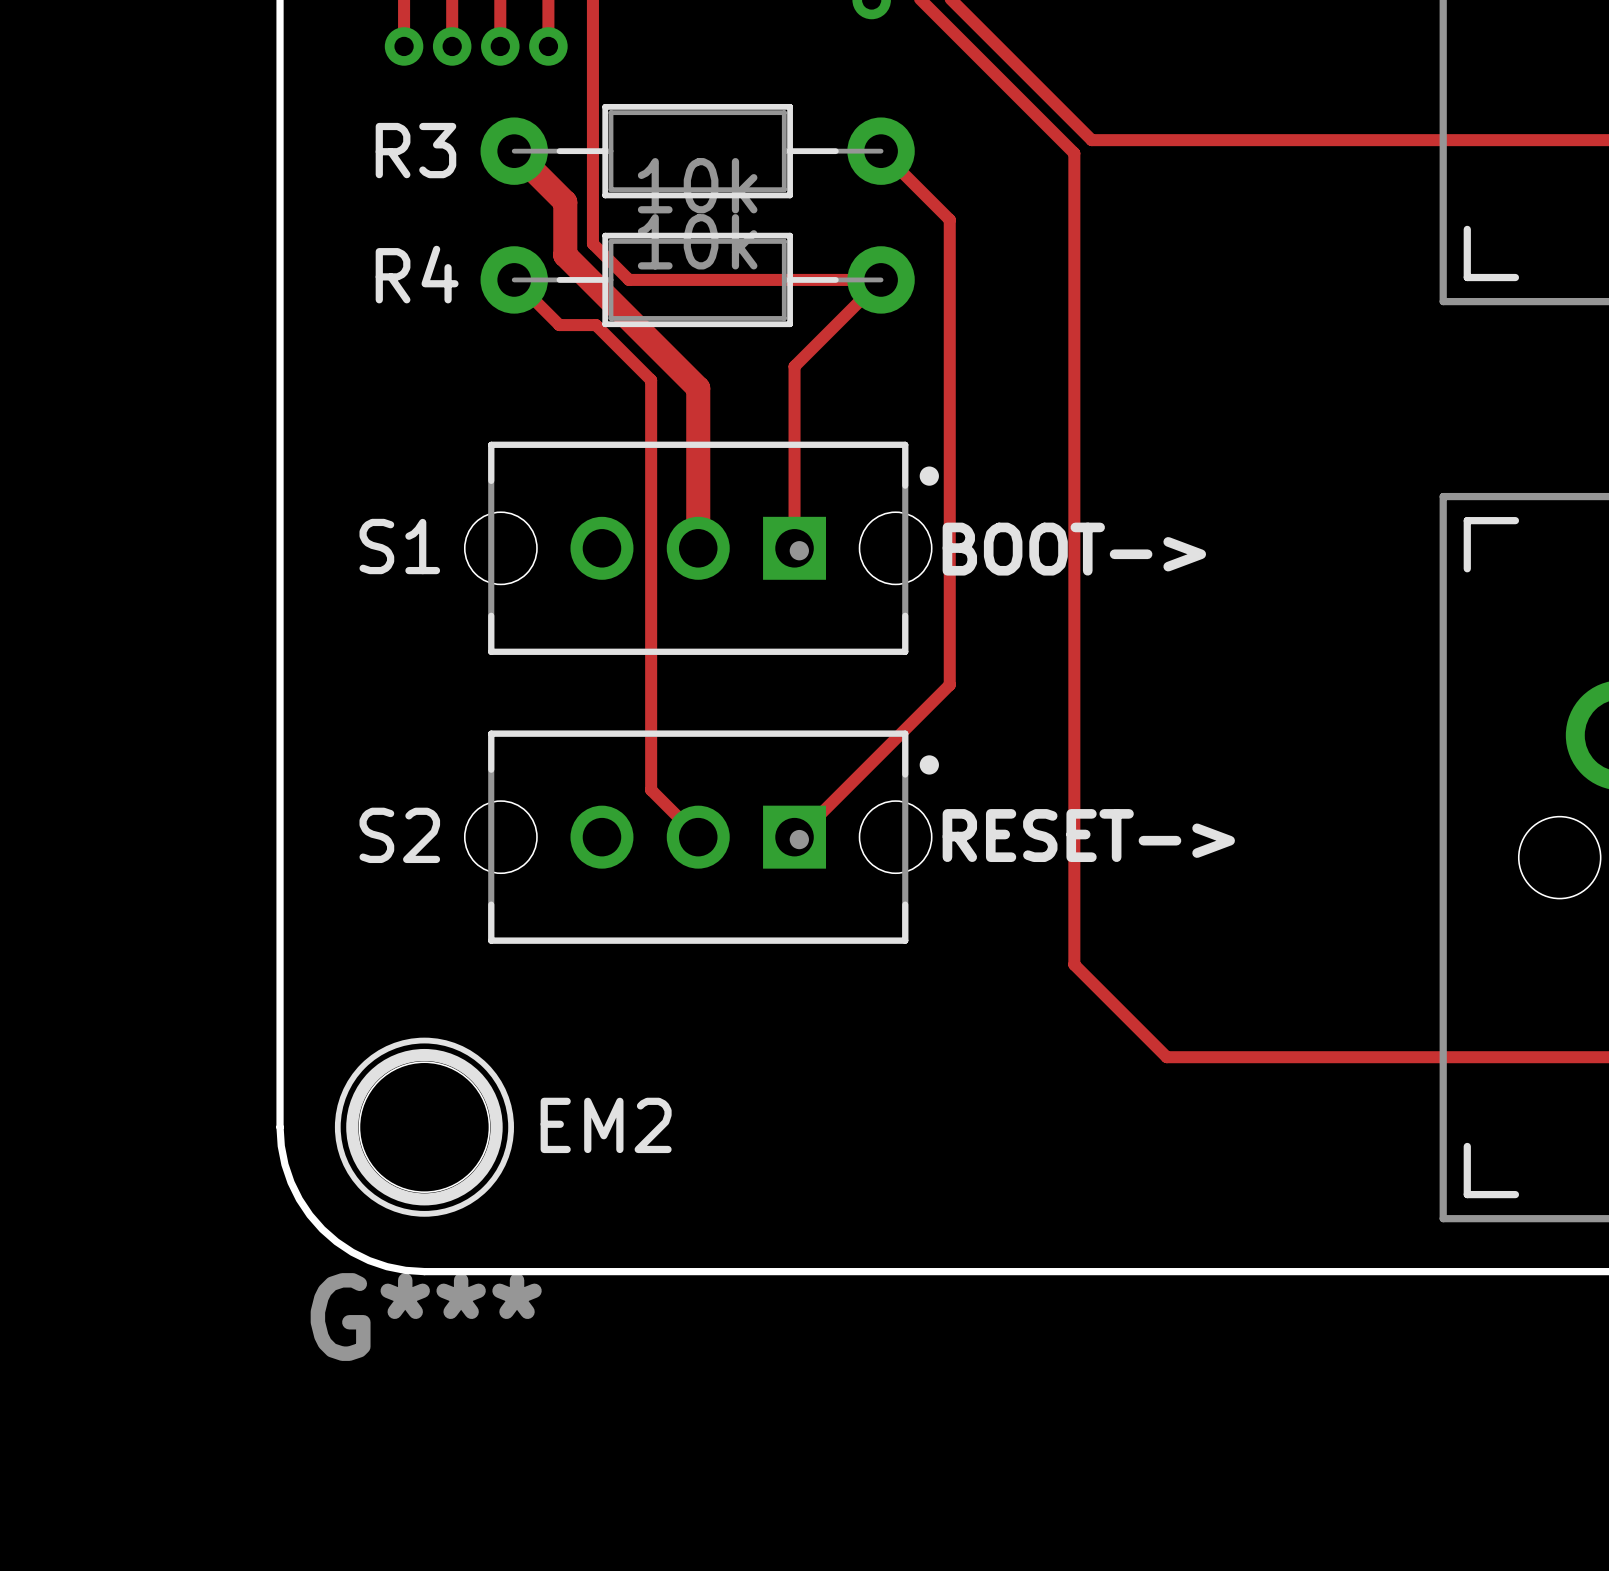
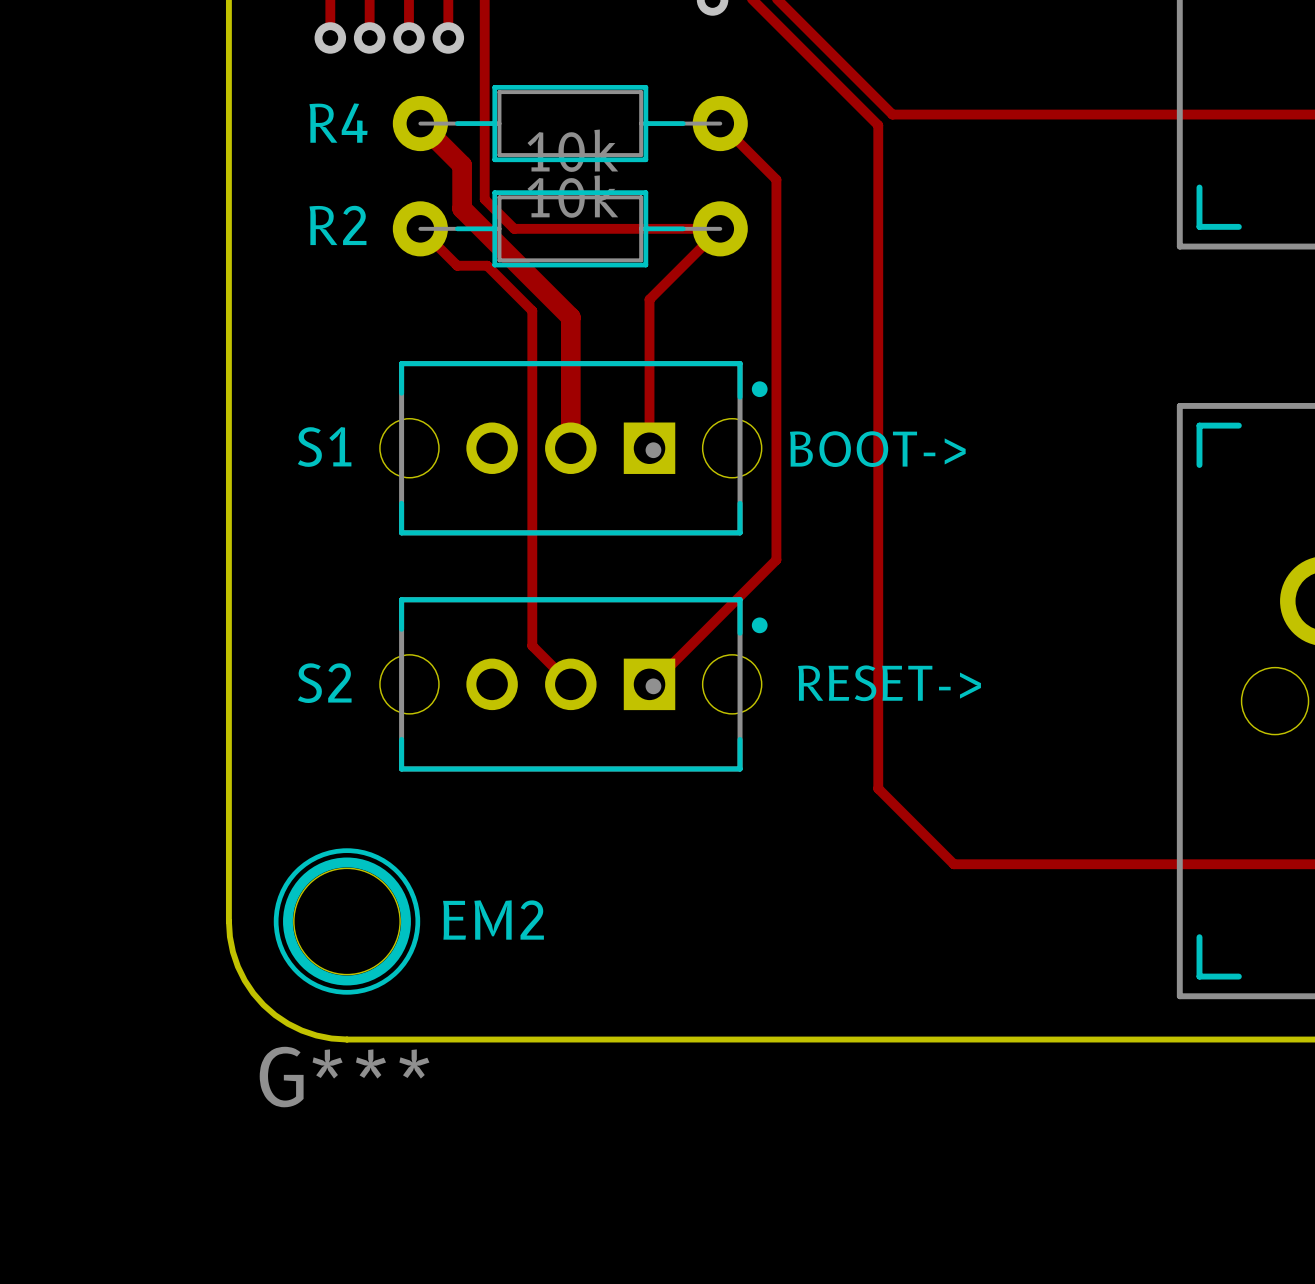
R3 name: R3 (415, 150) -> R4 (338, 123)
R4 name: R4 (417, 274) -> R2 (337, 225)

